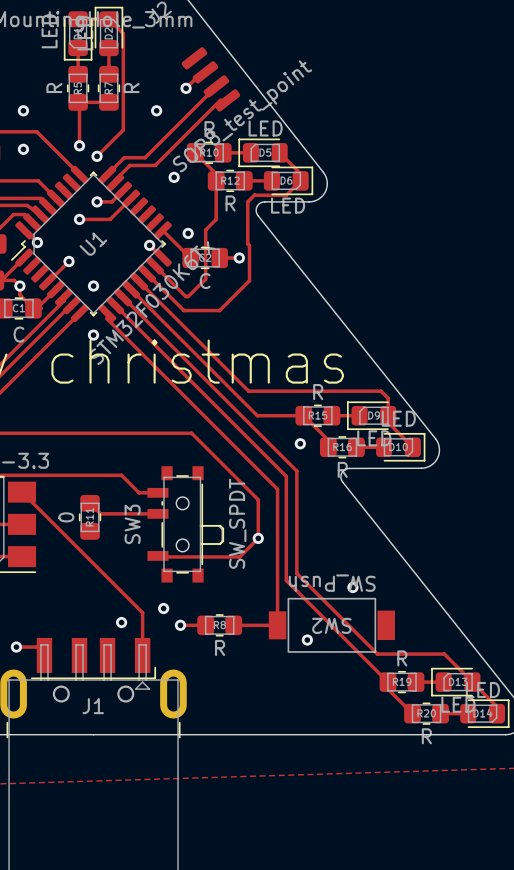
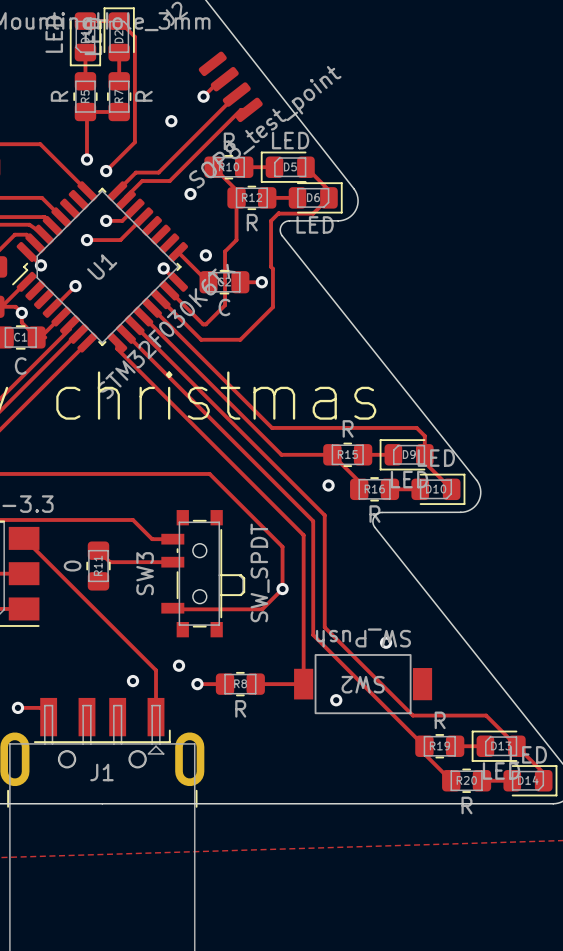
via: (23, 110) -> none
via: (23, 149) -> none
via: (93, 286) -> none
via: (93, 335) -> none

